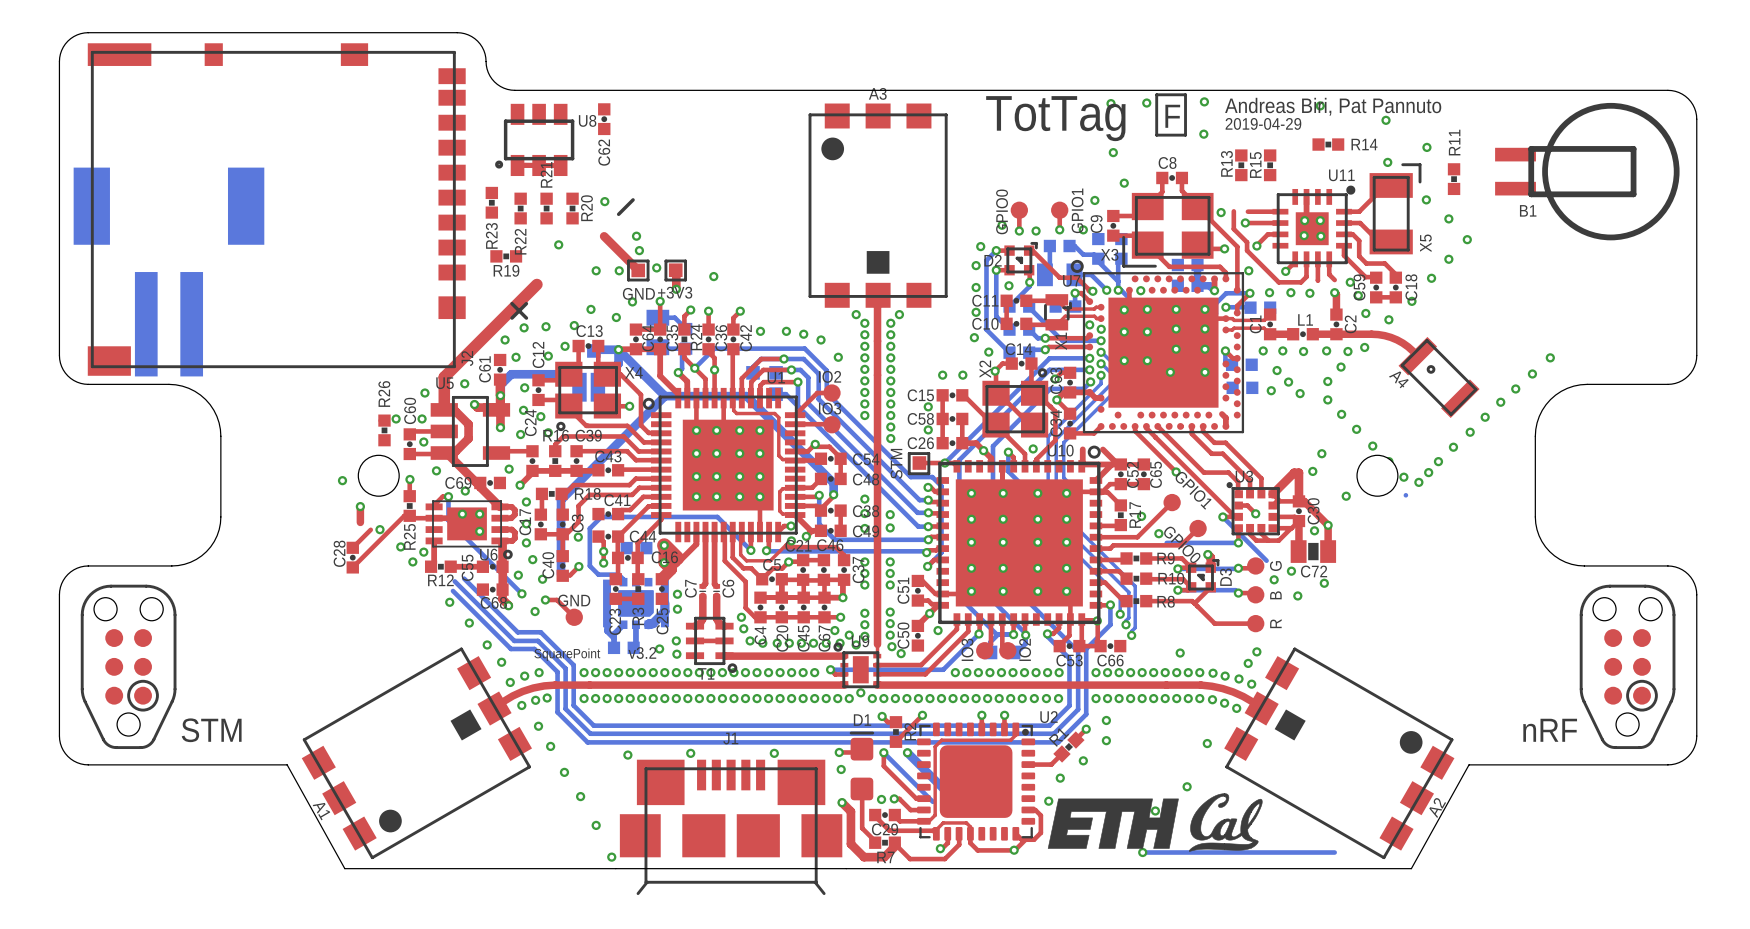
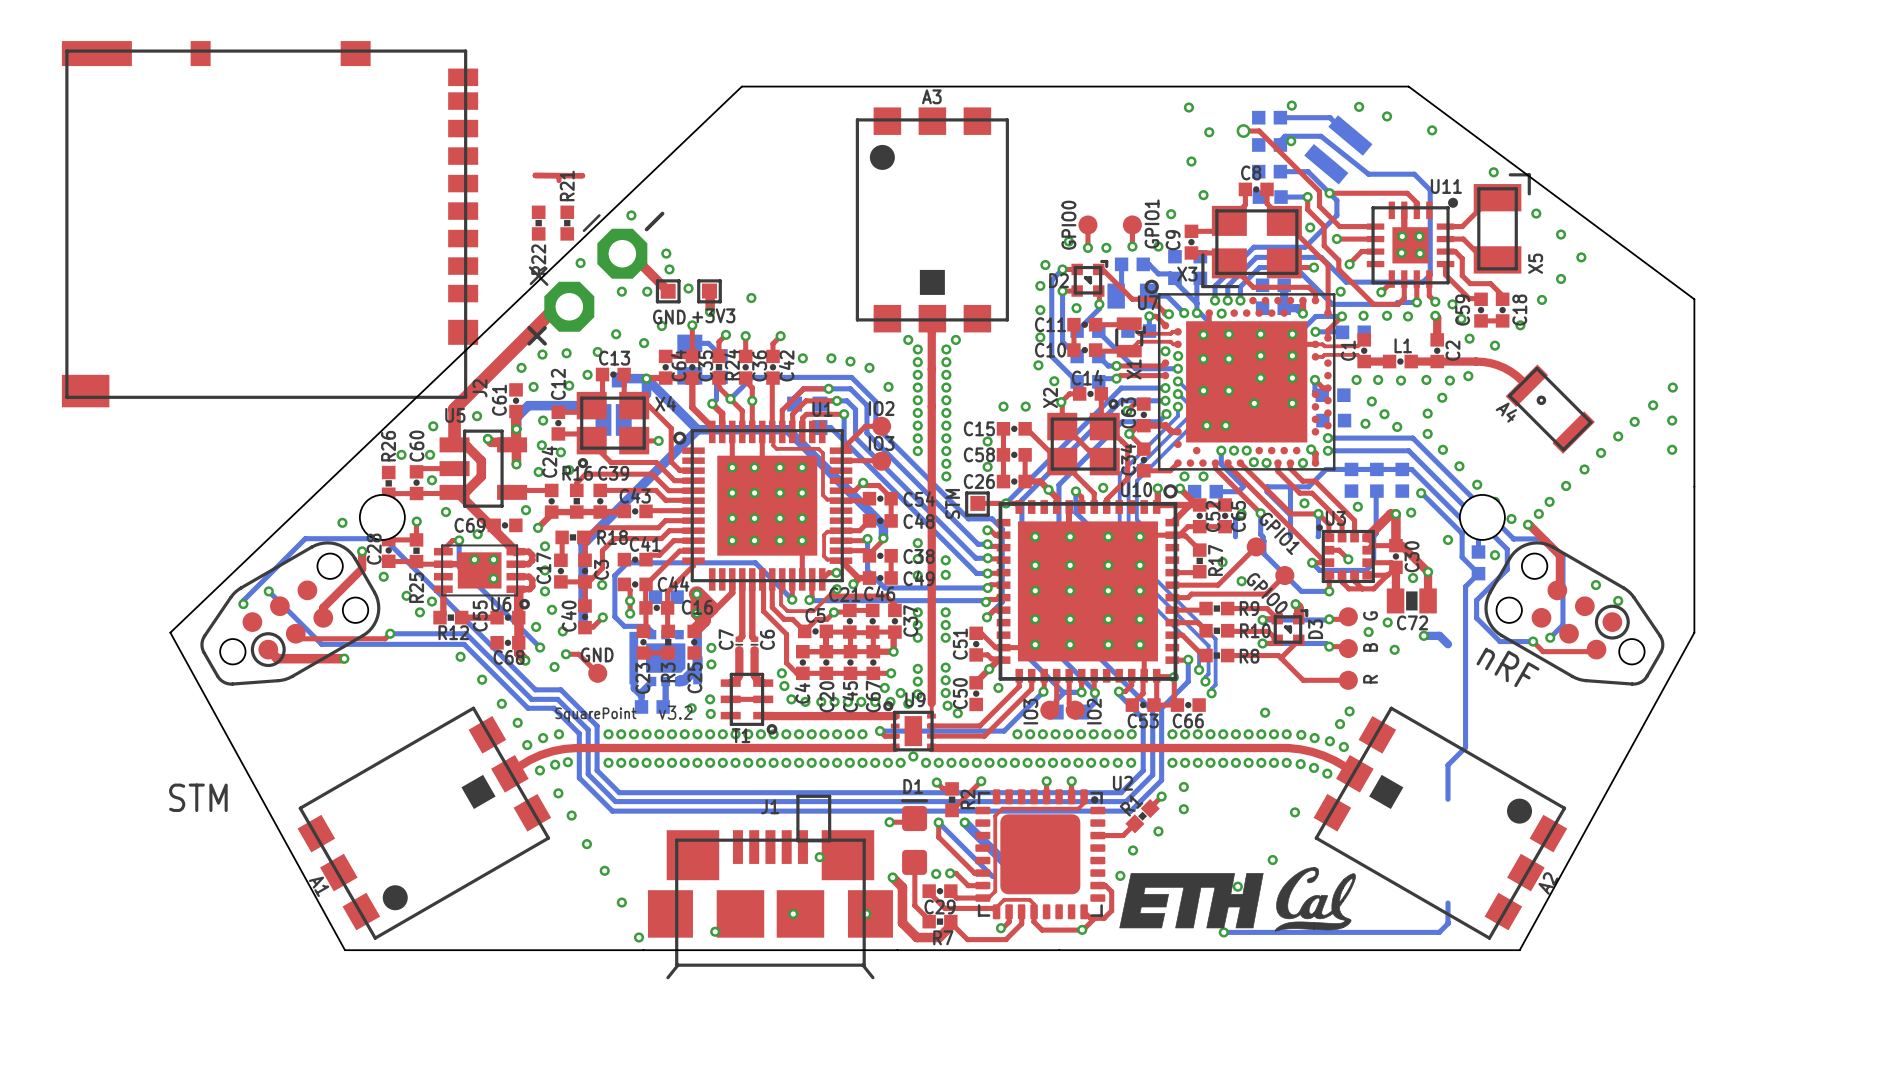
line: (1156, 94) (1185, 94) (1185, 135) (1156, 135) (1156, 94) -> none
via position: (1146, 103) -> (1209, 132)
via: none -> (1359, 106)
via: (1320, 105) -> none
text: Andreas Biri, Pat Pannuto (1333, 106) -> none
via: none -> (1387, 116)
bottom track: none -> (1280, 117) (1330, 117) (1347, 135) (1350, 135)
text: F (1172, 116) -> none
text: TotTag (1055, 118) -> none
C62: (604, 119) -> none
via: (1386, 120) -> none
text: 2019-04-29 (1263, 123) -> none
top track: none -> (1243, 131) (1259, 131) (1319, 191) (1319, 206) (1339, 226)
via: none -> (1243, 131)
via: none -> (1432, 130)
bottom track: none -> (1280, 144) (1280, 140) (1285, 136) (1321, 136) (1368, 174) (1414, 174) (1430, 190) (1430, 274) (1423, 282) (1346, 282) (1321, 257) (1256, 257) (1227, 286) (1227, 300)
U8: (534, 139) -> none
R14 side: top (1328, 144) -> bottom (1269, 171)
via: (1426, 147) -> none
bottom track: none -> (1280, 171) (1308, 171) (1336, 200) (1336, 215) (1305, 247) (1253, 247) (1215, 286) (1215, 300)
R13 side: top (1241, 165) -> bottom (1270, 197)
R15 side: top (1270, 165) -> bottom (1269, 144)
B1 side: top (1587, 171) -> bottom (1338, 149)
R11 side: top (1454, 179) -> bottom (1269, 117)
top track: none -> (1329, 193) (1407, 193) (1416, 202) (1416, 210)
via: none -> (1329, 193)
bottom track: none -> (1281, 197) (1307, 197)
top track: none -> (1307, 197) (1307, 209) (1324, 226)
via: none -> (1307, 197)
R23: (491, 202) -> none
R20: (572, 208) -> none
R19: (506, 256) -> none
part: none -> (595, 280)
part: (168, 272) -> none
via: none -> (1215, 300)
via: none -> (1227, 300)
bottom track: none -> (1240, 300) (1240, 286) (1259, 267) (1295, 267) (1332, 304) (1416, 302)
via: none -> (1240, 300)
via: none -> (1416, 302)
via: none -> (1435, 301)
via: none -> (1672, 420)
via: none -> (1206, 425)
via: none -> (1225, 425)
bottom track: none -> (1327, 438) (1412, 438) (1513, 538) (1545, 538) (1562, 556) (1562, 625) (1550, 637)
via: none -> (1327, 438)
via: none -> (1311, 449)
via: none -> (1672, 449)
bottom track: none -> (1221, 450) (1221, 464) (1243, 486) (1238, 491) (1216, 491)
via: none -> (1221, 450)
via: none -> (1234, 450)
via: none -> (1246, 450)
bottom track: none -> (1327, 450) (1408, 450) (1507, 549) (1507, 569) (1476, 600) (1476, 618) (1500, 641) (1533, 641)
via: none -> (1327, 450)
via: none -> (1253, 462)
via: none -> (1266, 462)
via: none -> (1302, 463)
R26 position: (384, 430) -> (388, 483)
via: none -> (1184, 476)
via: none -> (1203, 476)
part: none -> (1351, 480)
part: none -> (1376, 480)
part: none -> (1402, 480)
bottom track: none -> (1290, 487) (1290, 536)
via: none -> (1157, 488)
via: none -> (1180, 488)
part: none -> (1205, 491)
bottom track: none -> (1421, 493) (1462, 533) (1462, 557) (1478, 573) (1465, 586) (1465, 747) (1447, 765) (1447, 799)
top track: none -> (416, 493) (388, 494)
via: none -> (1304, 503)
via: none -> (1357, 506)
bottom track: none -> (1241, 513) (1235, 520) (1235, 536)
via: none -> (1241, 513)
bottom track: none -> (1318, 513) (1317, 536)
via: none -> (1318, 513)
via: none -> (1395, 514)
bottom track: none -> (1290, 515) (1267, 491) (1267, 486) (1308, 486) (1326, 469) (1411, 469) (1478, 536) (1478, 552)
top track: none -> (1528, 524) (1559, 555) (1559, 587) (1557, 590)
top track: none -> (388, 539) (416, 539)
via: none -> (1495, 555)
top track: (404, 515) (352, 567) -> (410, 561) (388, 561)
part: none -> (1478, 562)
top track: none -> (362, 568) (323, 607) (323, 617)
bottom track: (1229, 523) (1266, 560) -> (1319, 570) (1366, 570) (1373, 562) (1372, 536) (1376, 533) (1376, 491)
top track: (370, 529) (352, 547) -> none
via: none -> (1595, 585)
bottom track: none -> (268, 591) (321, 644) (464, 644)
via: none -> (268, 591)
bottom track: (1166, 542) (1213, 542) -> (1260, 513) (1260, 534) (1263, 540) (1263, 553) (1301, 591)
via: none -> (1618, 600)
bottom track: none -> (243, 604) (243, 600) (305, 538) (384, 538) (476, 630)
via: none -> (243, 604)
C28 position: (352, 557) -> (388, 550)
part: none -> (290, 613)
part: none -> (1574, 613)
top track: none -> (295, 633) (300, 638) (385, 638) (390, 633)
bottom track: none -> (390, 633) (466, 633)
via: none -> (390, 633)
bottom track: none -> (1423, 635) (1439, 635) (1447, 644)
via: none -> (1550, 637)
top track: none -> (1533, 641) (1543, 651) (1594, 651) (1596, 649)
via: none -> (1533, 641)
top track: none -> (268, 649) (277, 658) (344, 658)
via: none -> (344, 658)
part: (128, 666) -> none
part: (1627, 666) -> none
line: none -> (797, 796) (829, 796) (829, 840) (797, 840) (797, 796)
text rotation: 0° (1550, 730) -> 30° clockwise (1508, 667)
text position: nRF (1550, 730) -> nRF (1508, 667)
via: (690, 753) -> none
via position: (774, 753) -> (819, 857)
via: (627, 755) -> none
via: (841, 769) -> none
bottom track: none -> (1447, 903) (1448, 923) (1439, 932) (1435, 932)
via: none -> (793, 913)
via: none -> (866, 913)
via: none -> (715, 931)
board edge: (344, 868) (287, 764) (84, 764) (70, 758) (60, 743) (59, 594) (65, 577) (73, 569) (84, 566) (171, 565) (190, 562) (201, 555) (214, 541) (219, 529) (220, 516) (220, 429) (216, 416) (205, 399) (188, 388) (175, 384) (80, 383) (67, 375) (60, 363) (59, 61) (65, 43) (80, 33) (461, 32) (471, 36) (480, 43) (485, 54) (488, 72) (494, 81) (503, 88) (514, 90) (1667, 90) (1682, 94) (1692, 104) (1696, 119) (1696, 355) (1694, 366) (1685, 378) (1675, 383) (1580, 384) (1567, 388) (1550, 399) (1539, 416) (1535, 429) (1535, 516) (1537, 529) (1541, 541) (1554, 555) (1565, 562) (1584, 565) (1671, 566) (1682, 569) (1690, 577) (1696, 594) (1696, 736) (1694, 747) (1685, 758) (1671, 764) (1469, 764) (1411, 868) -> (344, 950) (170, 632) (741, 86) (1408, 86) (1694, 299) (1694, 632) (1519, 950)

